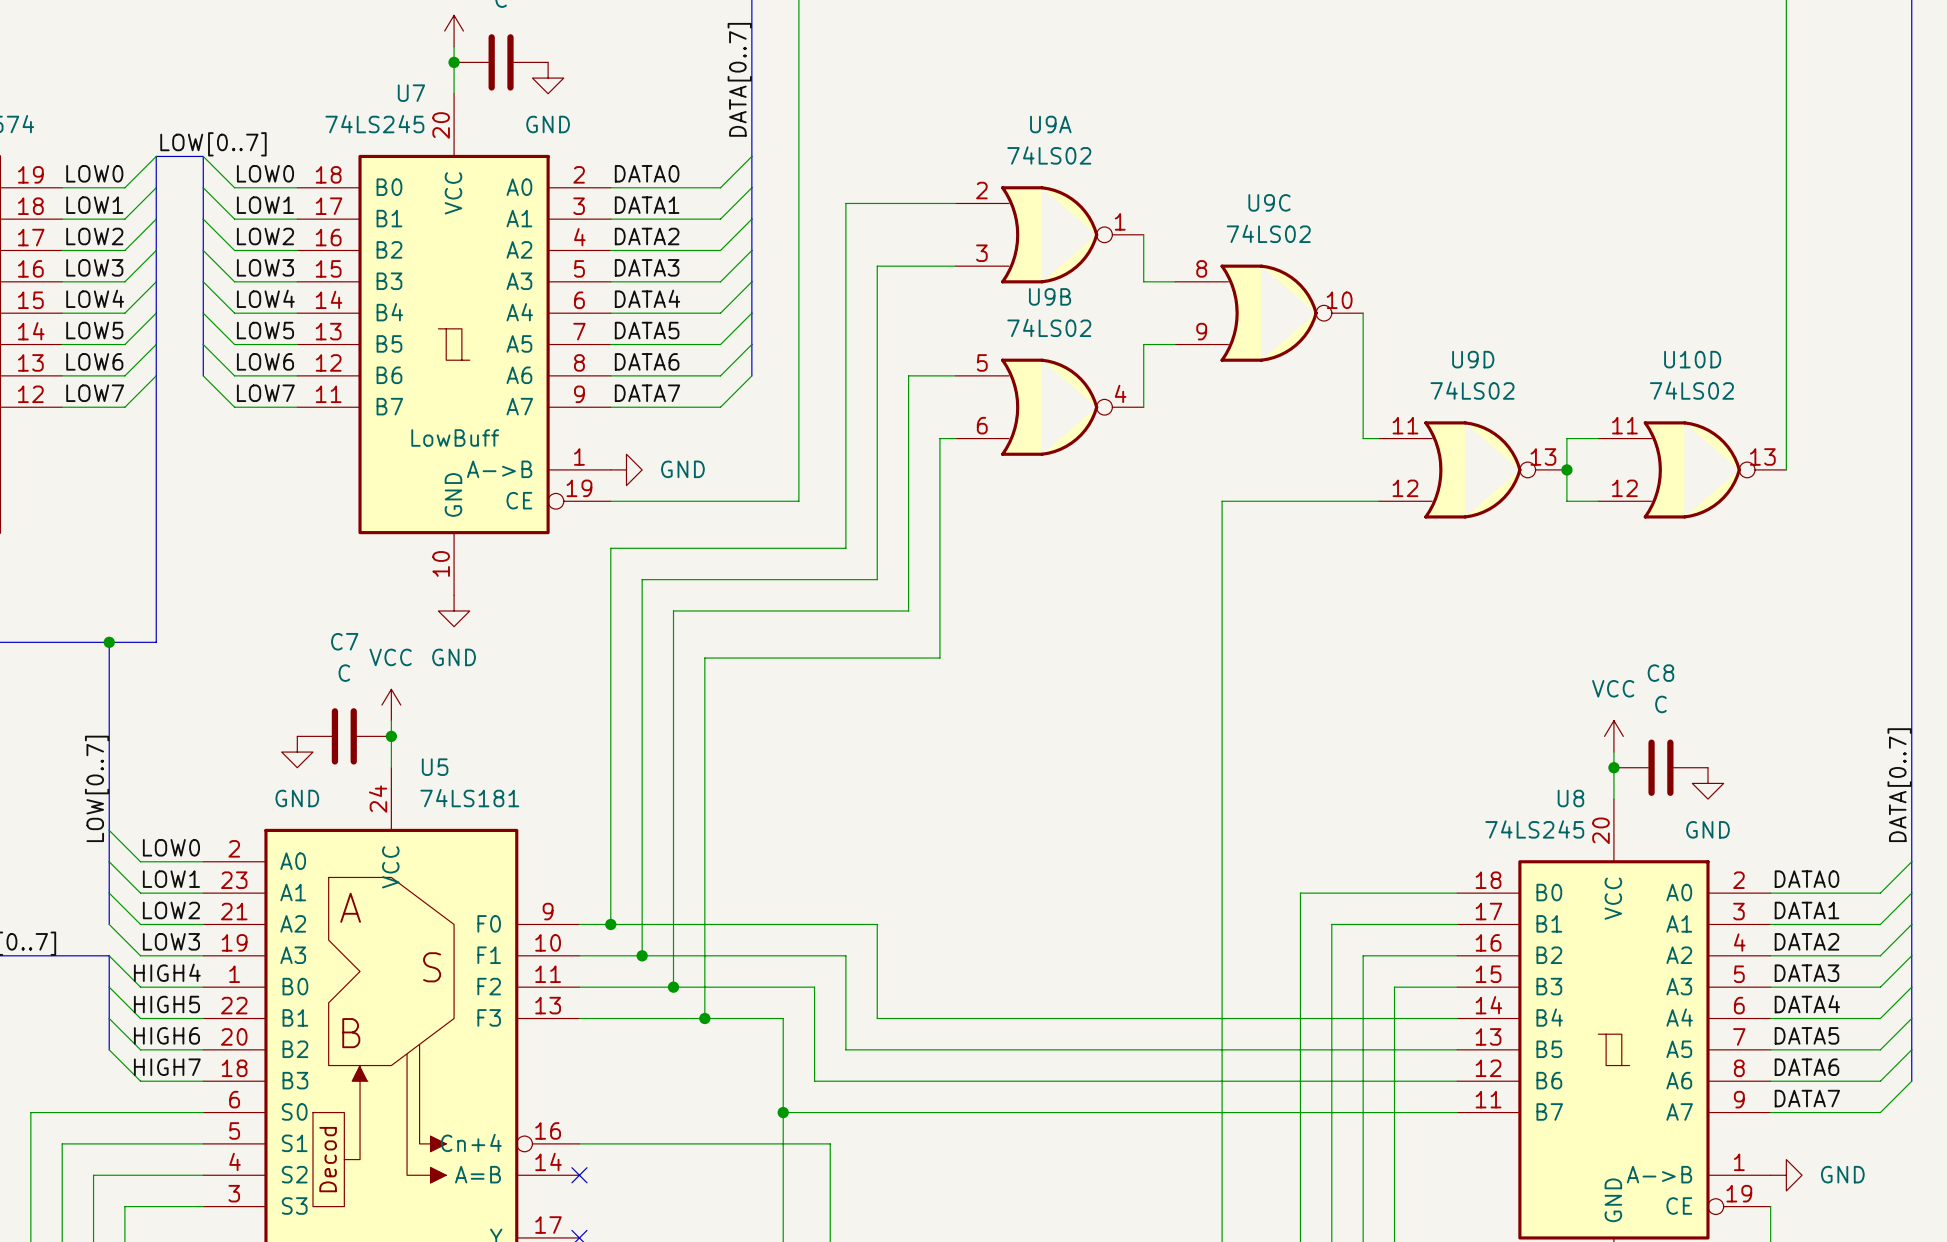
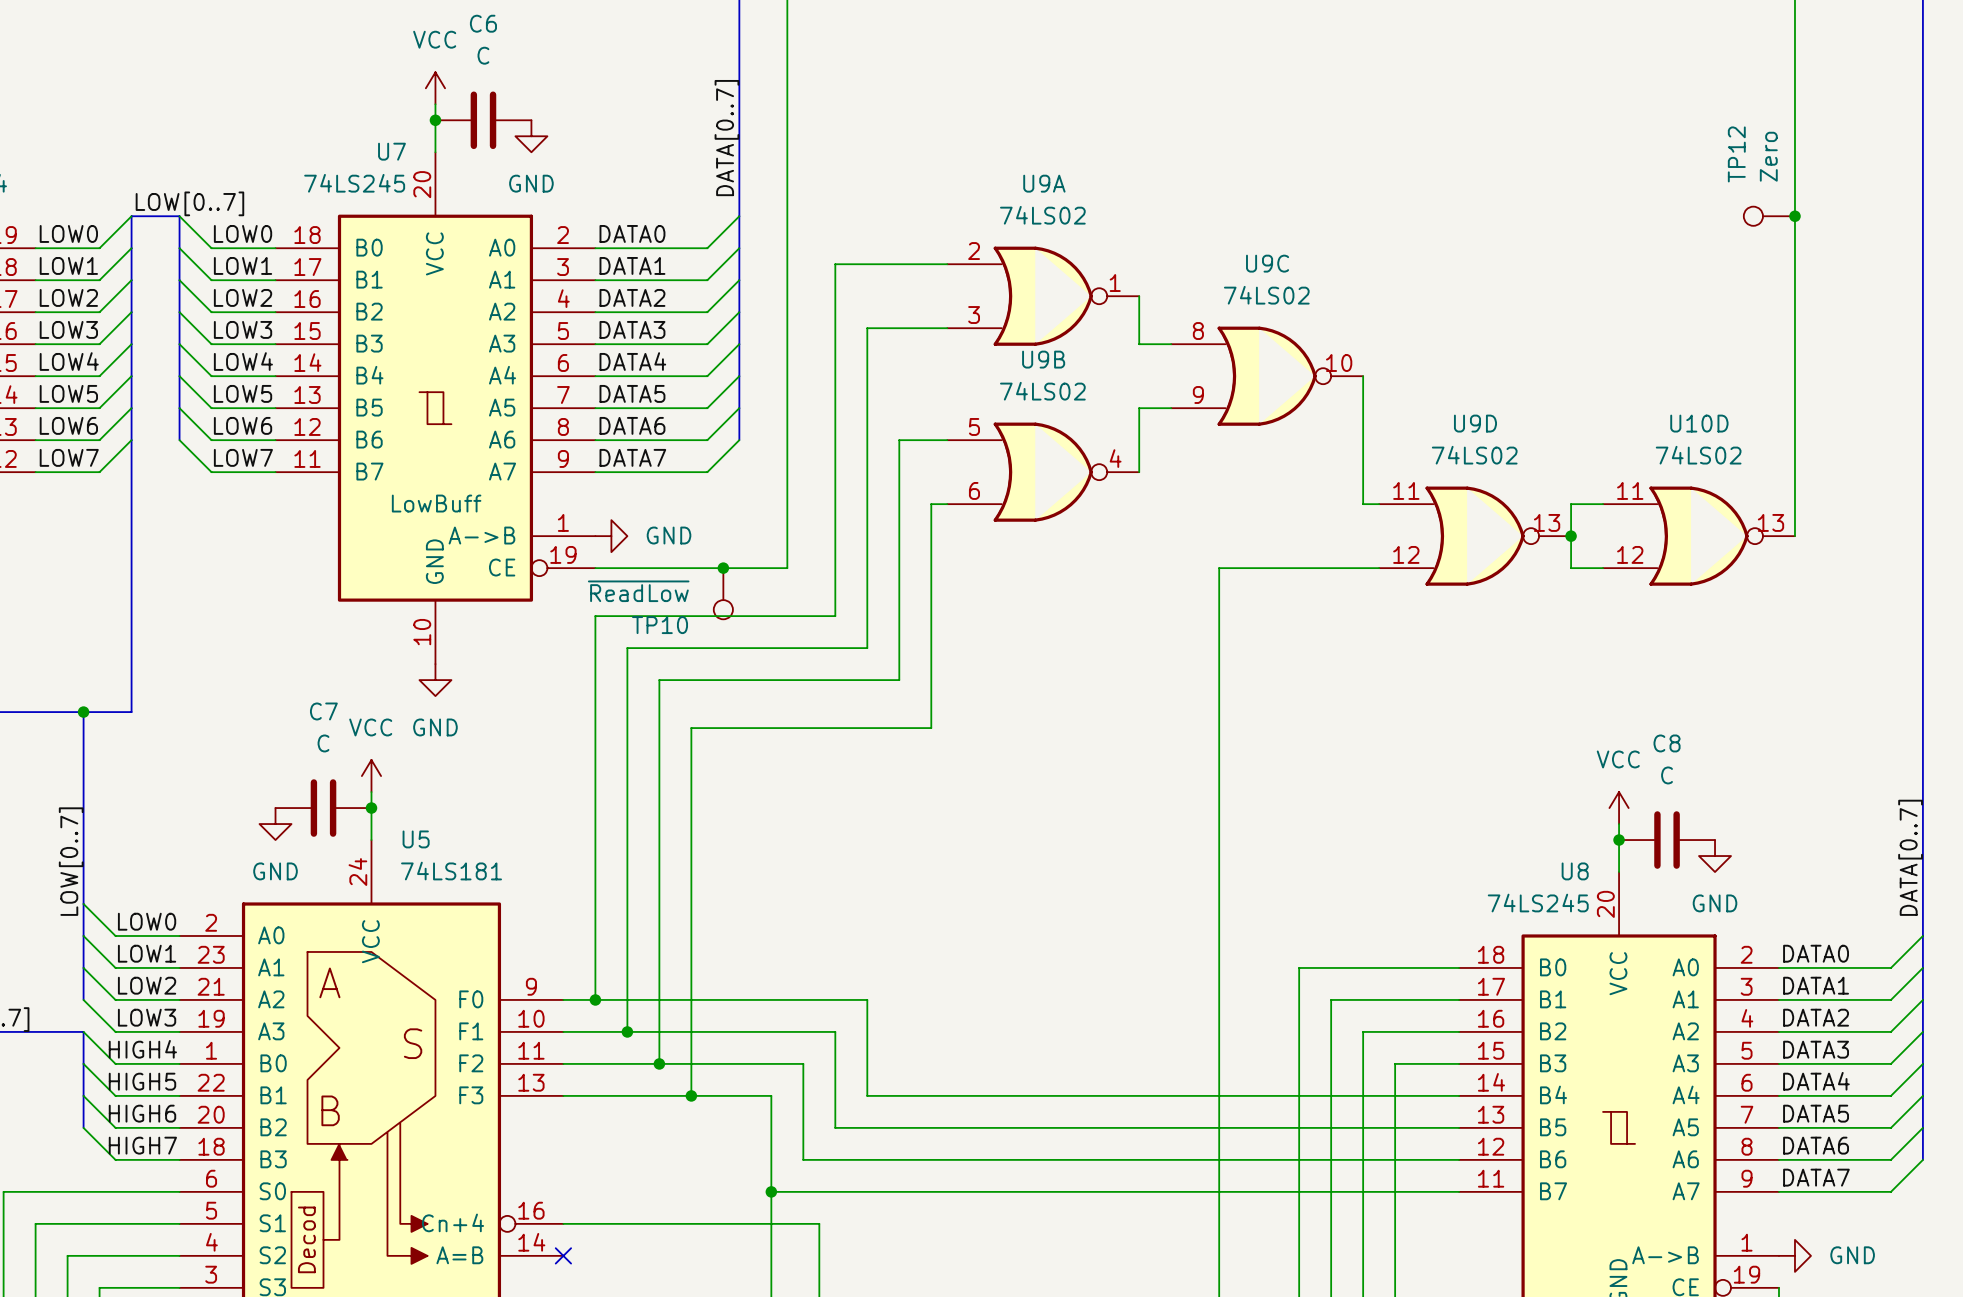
TP12: none -> Zero (1769, 216)
junction: none -> (1794, 216)
junction: none -> (723, 568)
TP10: none -> ~{ReadLow} (723, 593)

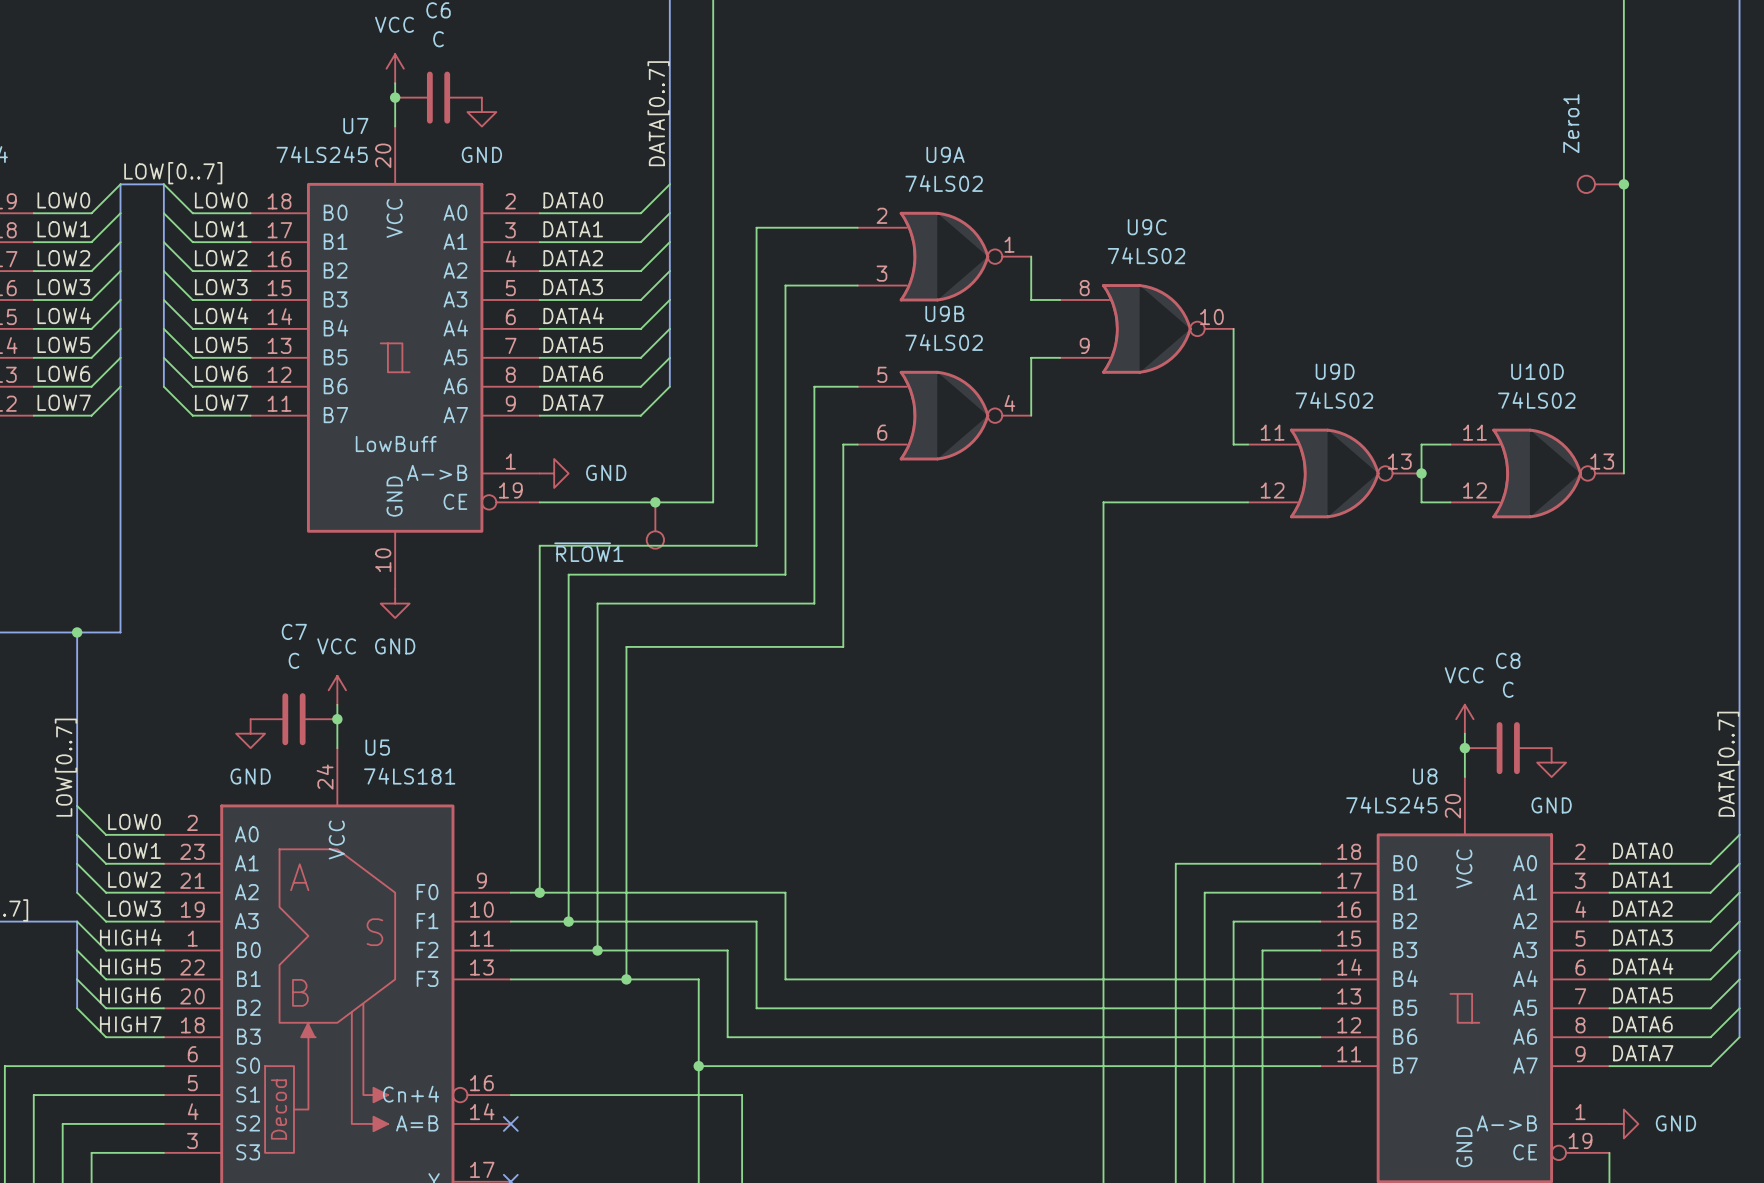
TP12 name: TP12 (1736, 154) -> Zero1 (1571, 123)
TP12 value: Zero (1768, 156) -> none
TP10 value: ~{ReadLow} (638, 591) -> none
TP10 name: TP10 (660, 625) -> ~{RLOW}1 (588, 552)

